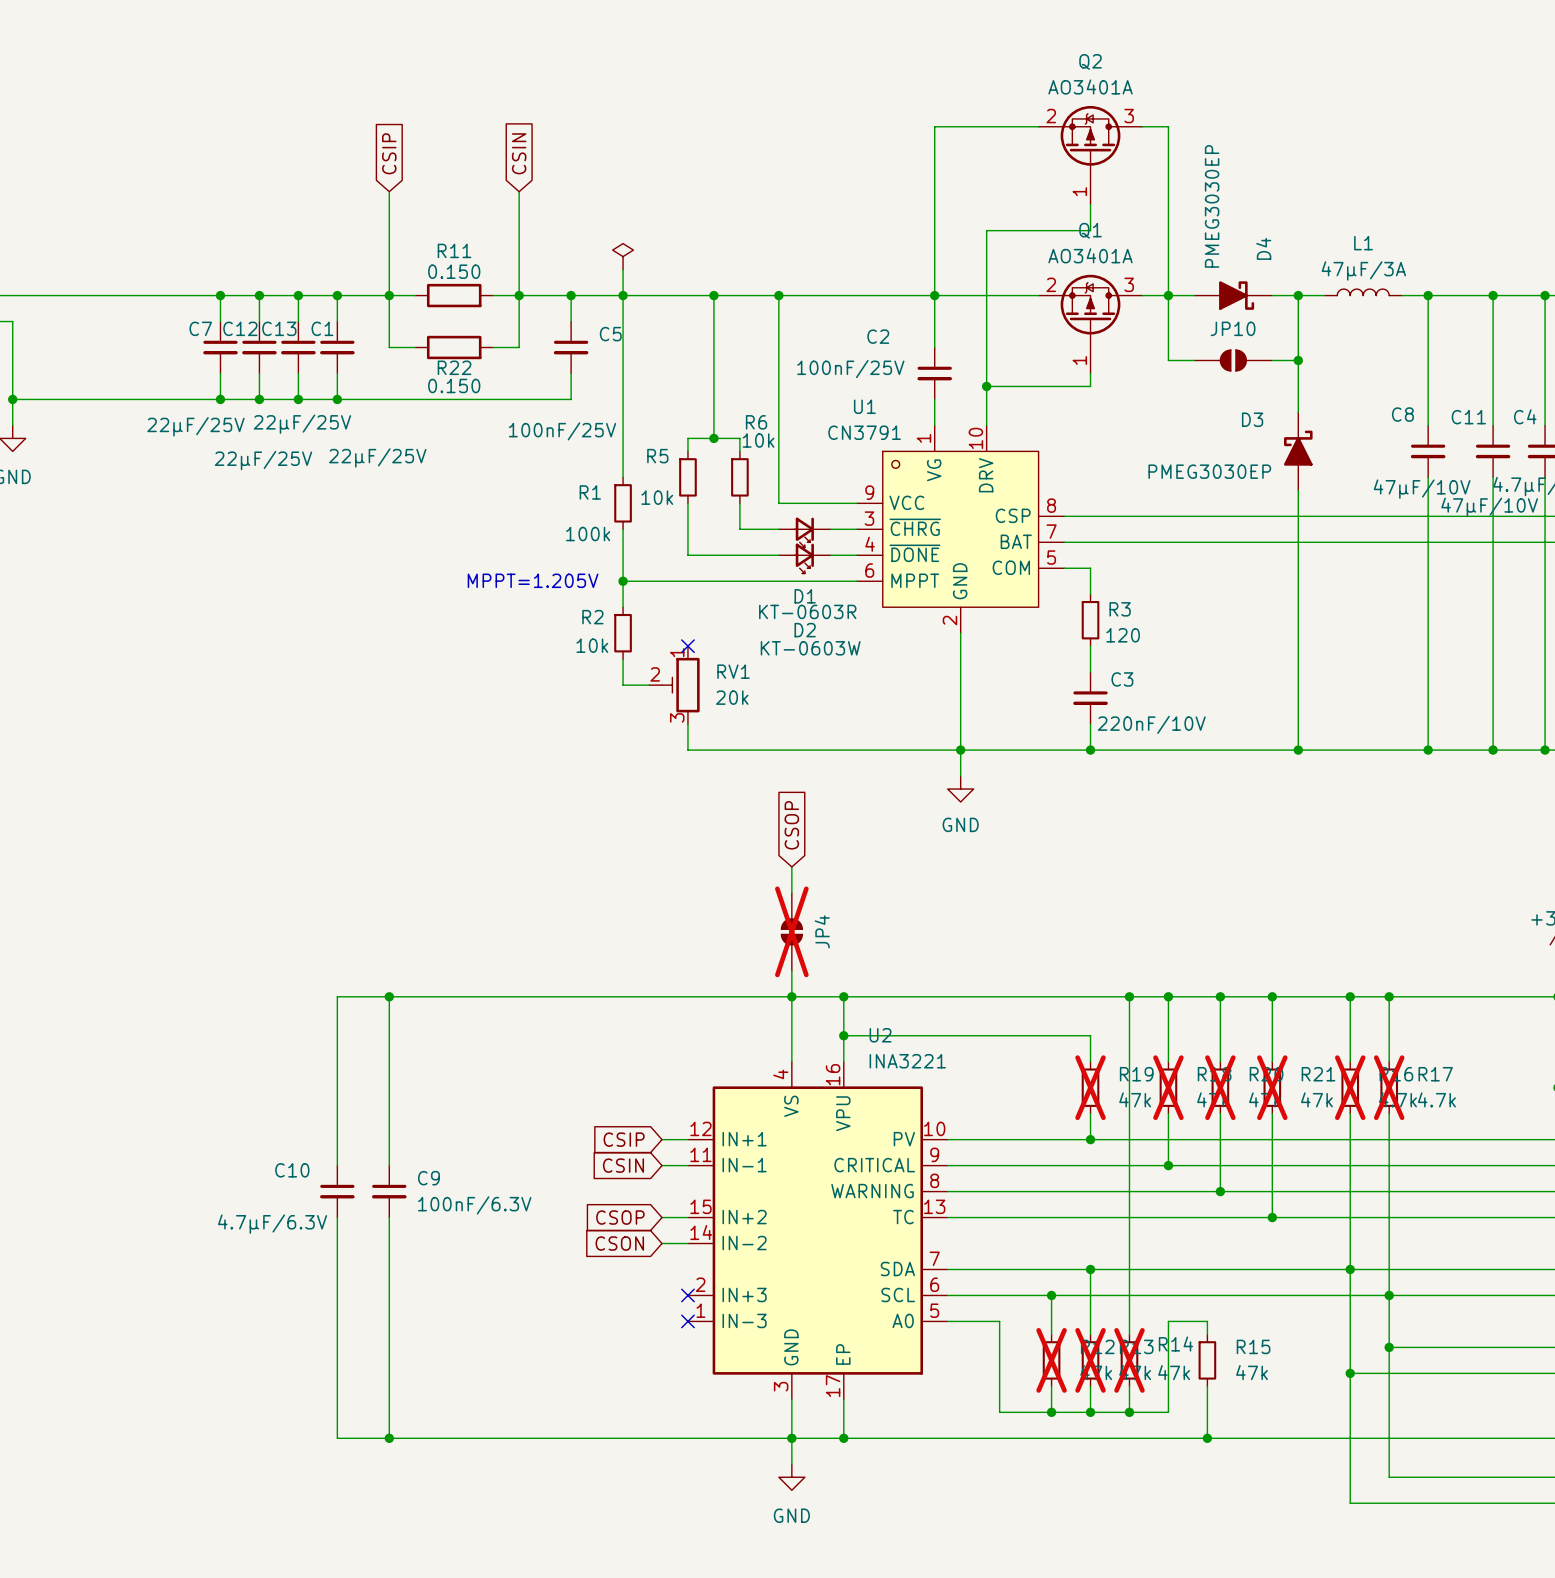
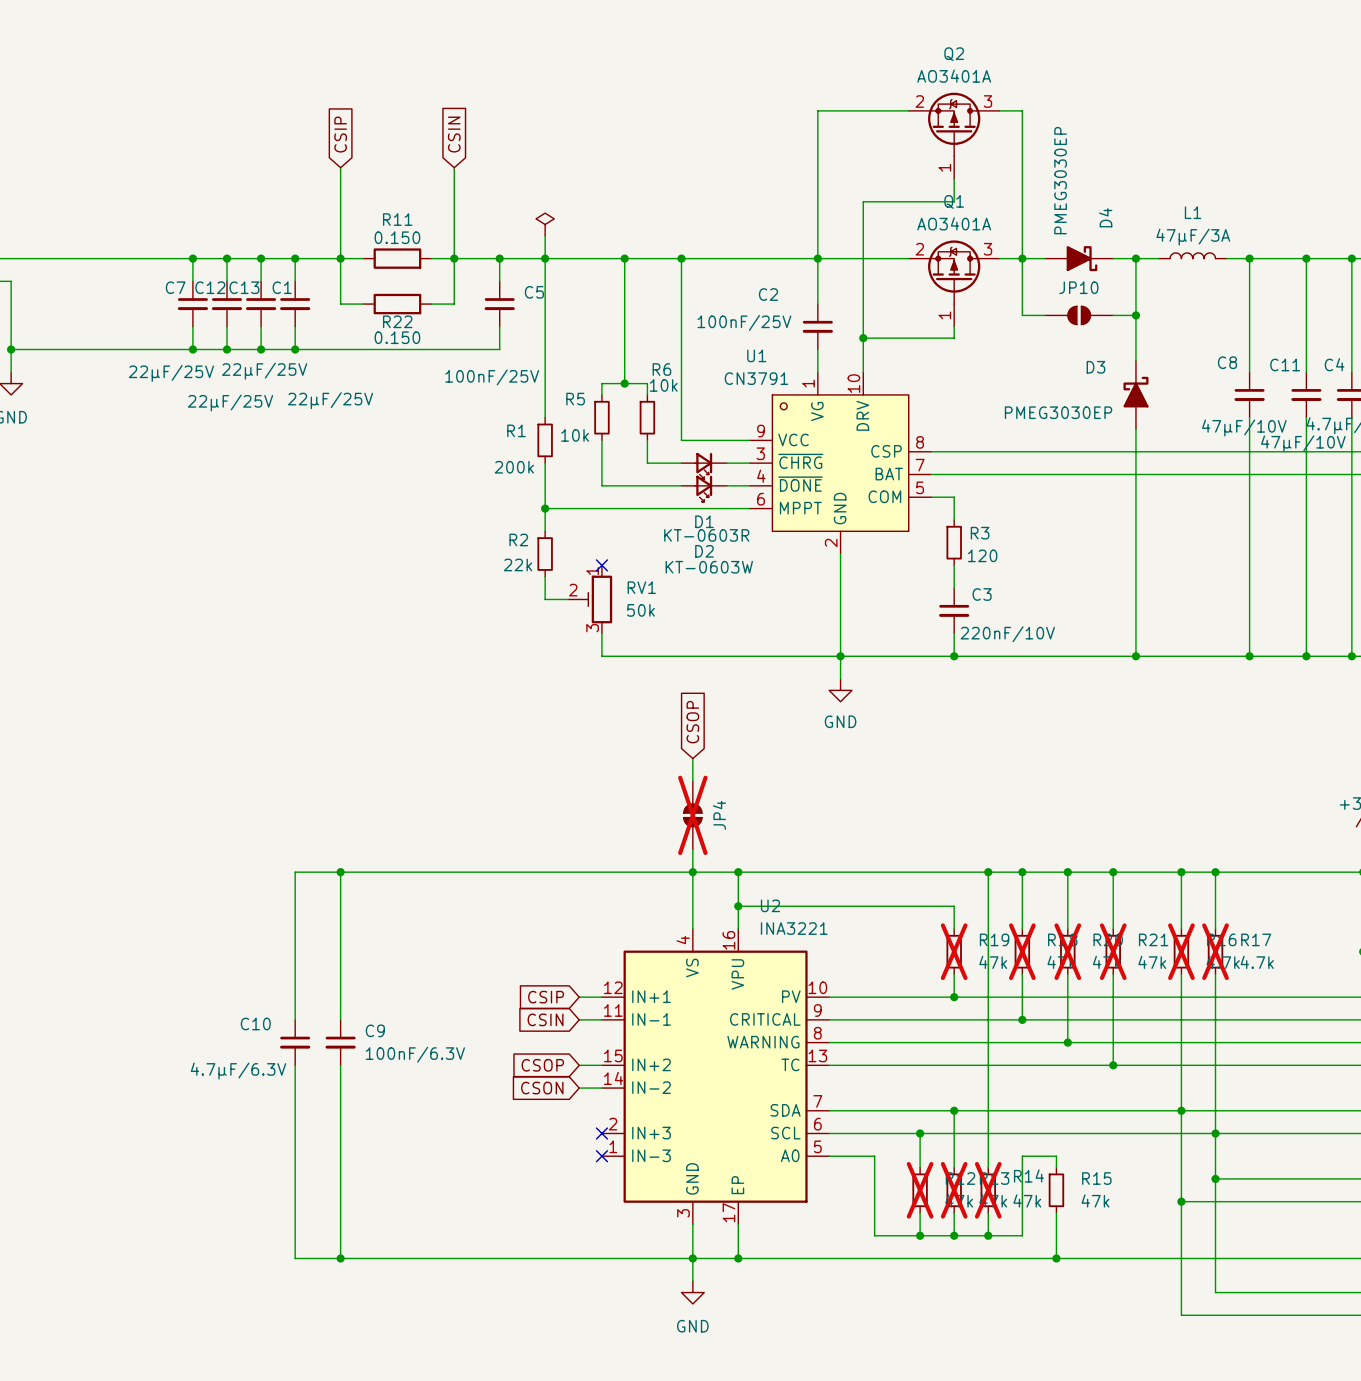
R1 value: 100k (588, 534) -> 200k (514, 467)
text: MPPT=1.205V (533, 580) -> none
R2 value: 10k (592, 645) -> 22k (518, 564)
RV1 value: 20k (732, 697) -> 50k (640, 610)

